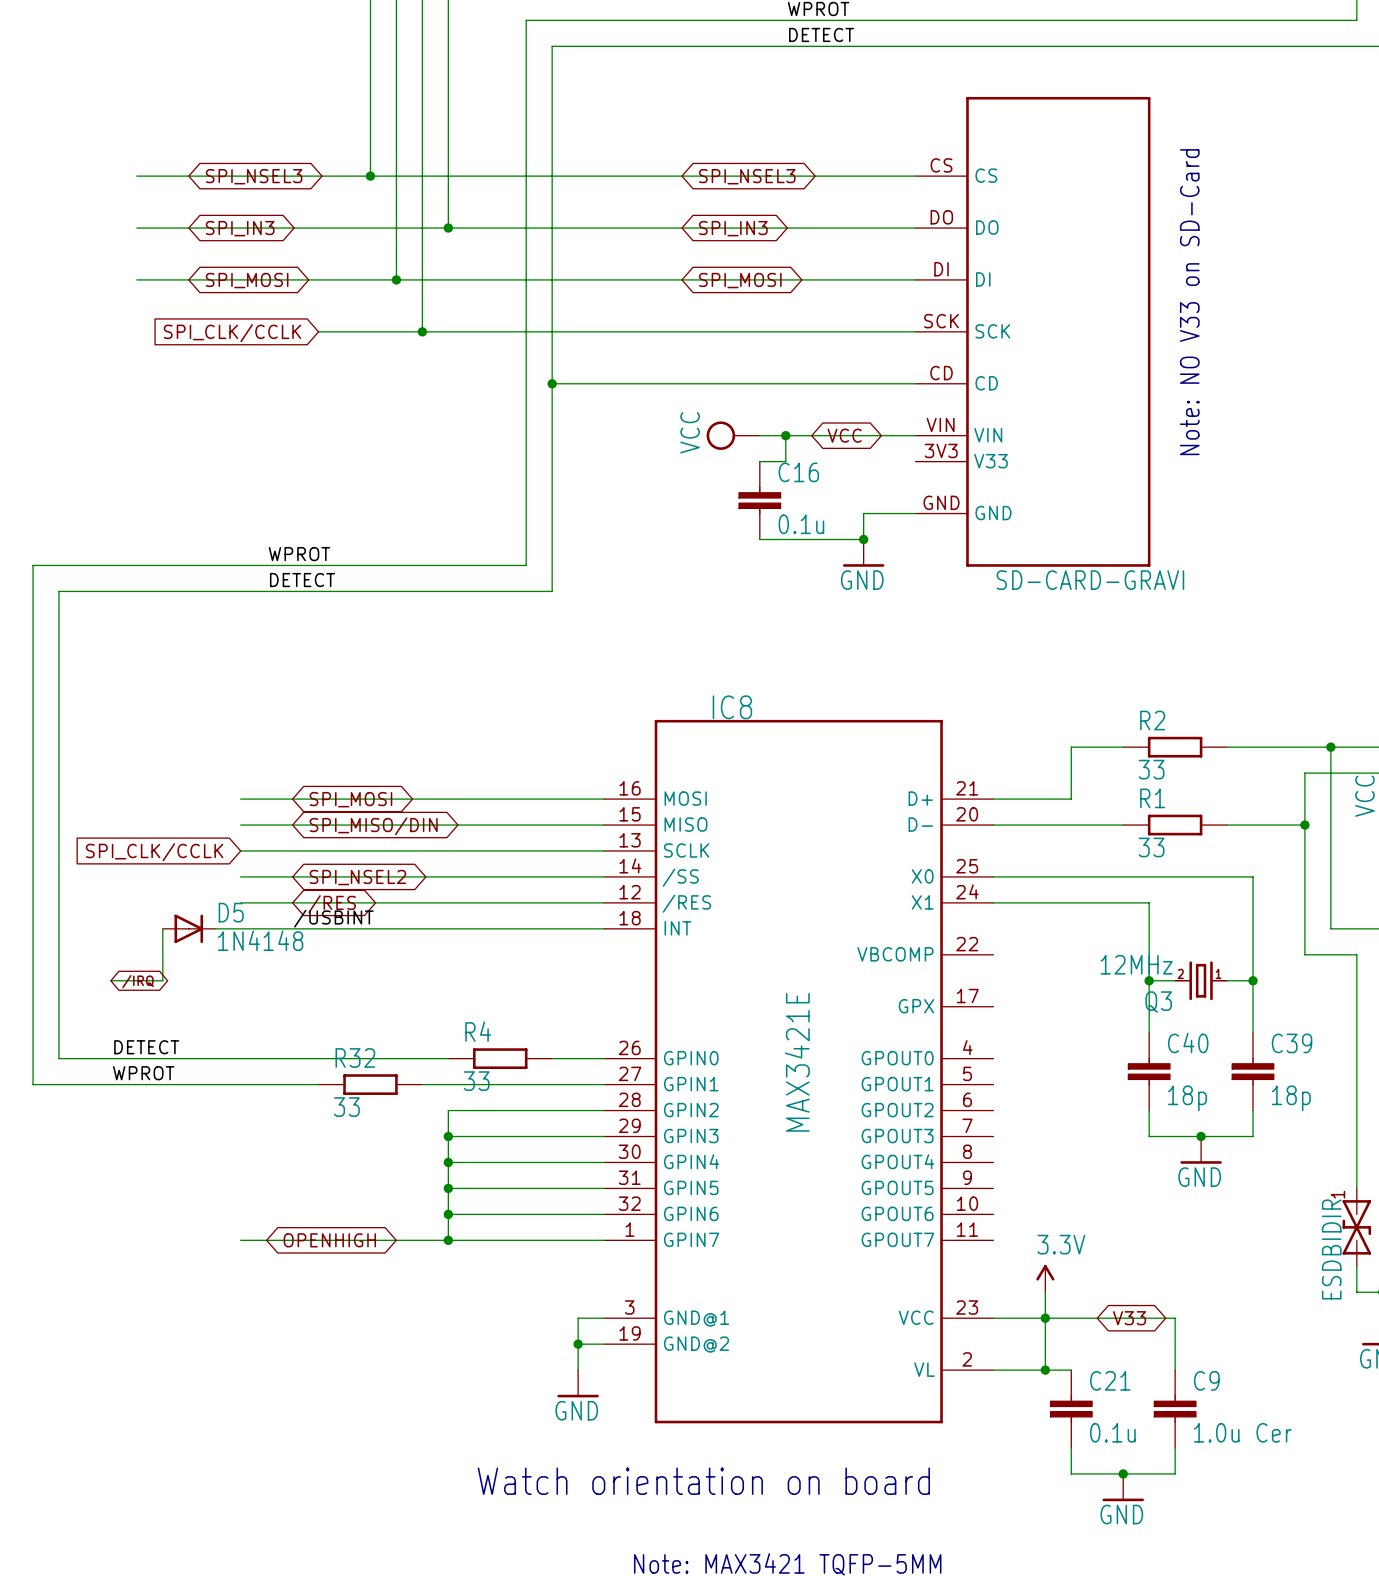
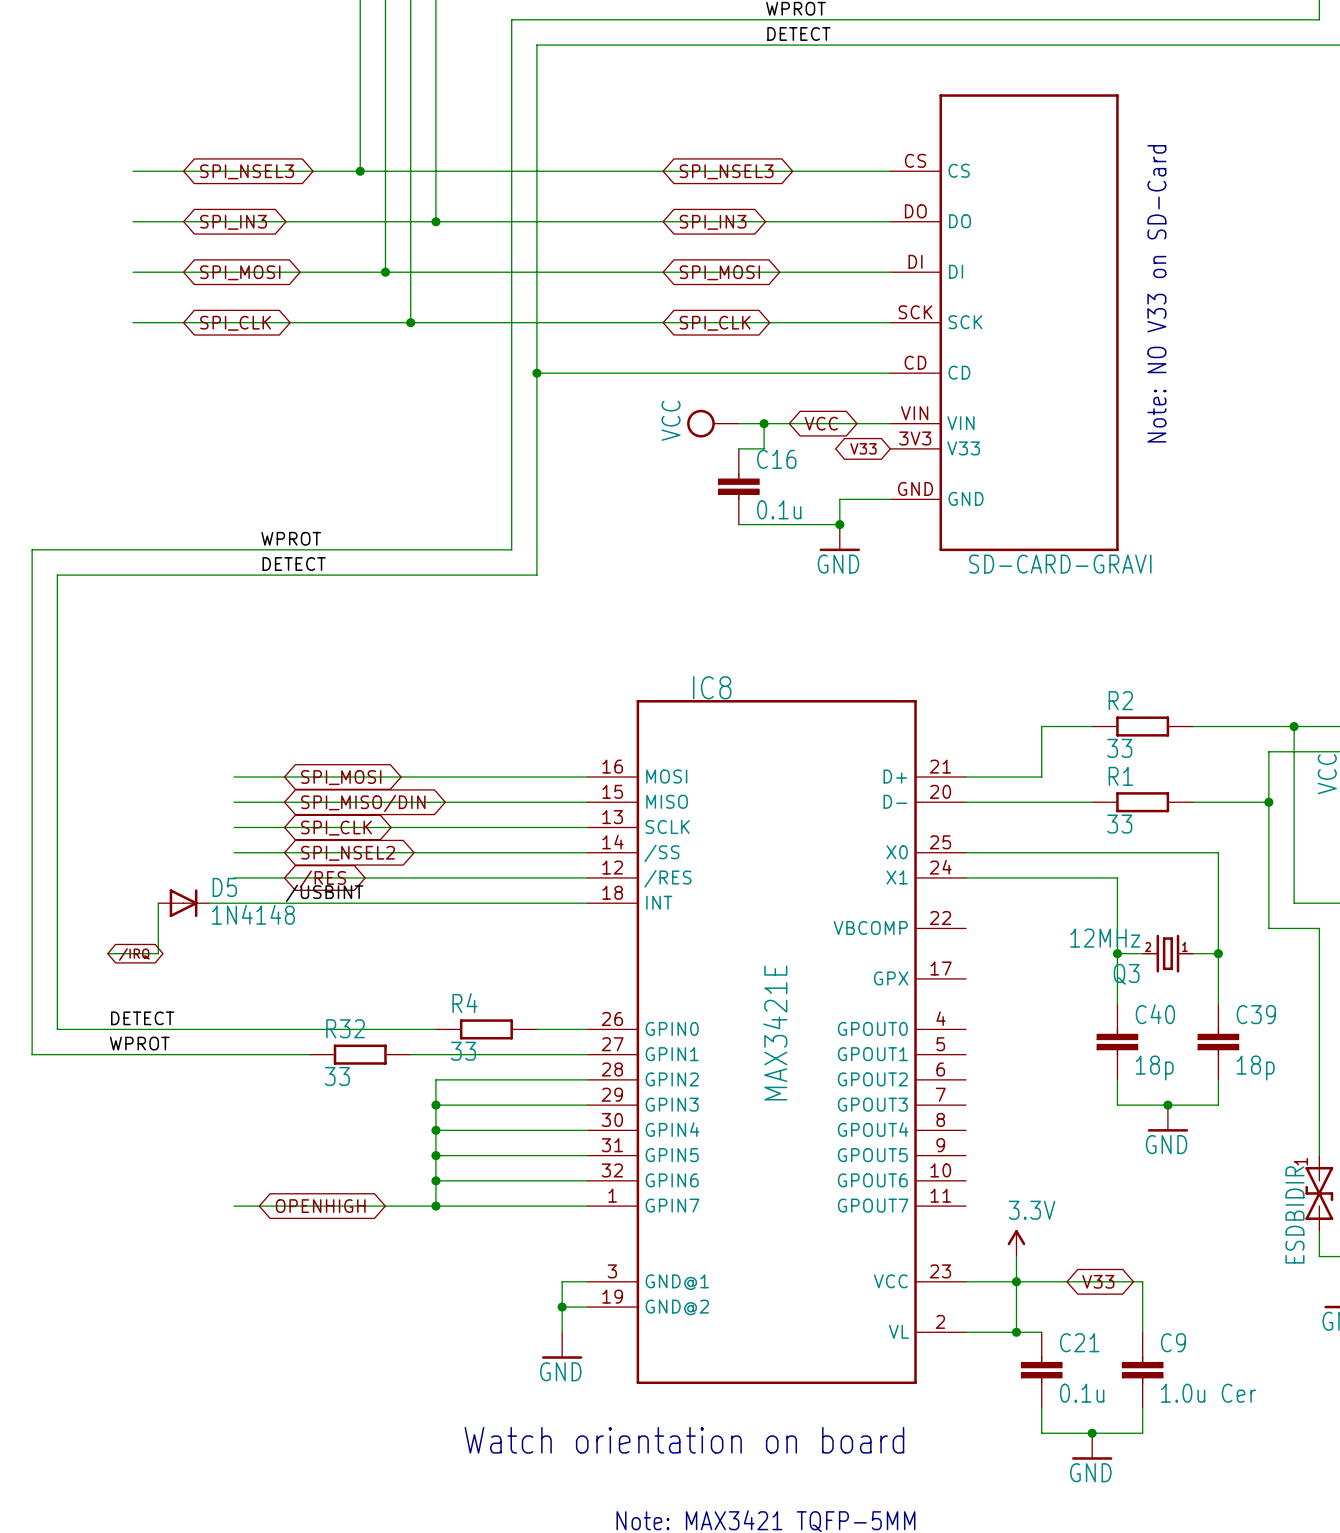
wire: none -> (133, 322) (309, 322)
global label: none -> SPI_CLK (715, 323)
global label shape: input (232, 333) -> bidirectional (235, 323)
global label: SPI_CLK/CCLK (232, 333) -> SPI_CLK (235, 323)
global label: none -> V33 (863, 448)
global label: none -> SPI_CLK (336, 828)
global label: SPI_CLK/CCLK (154, 852) -> none

